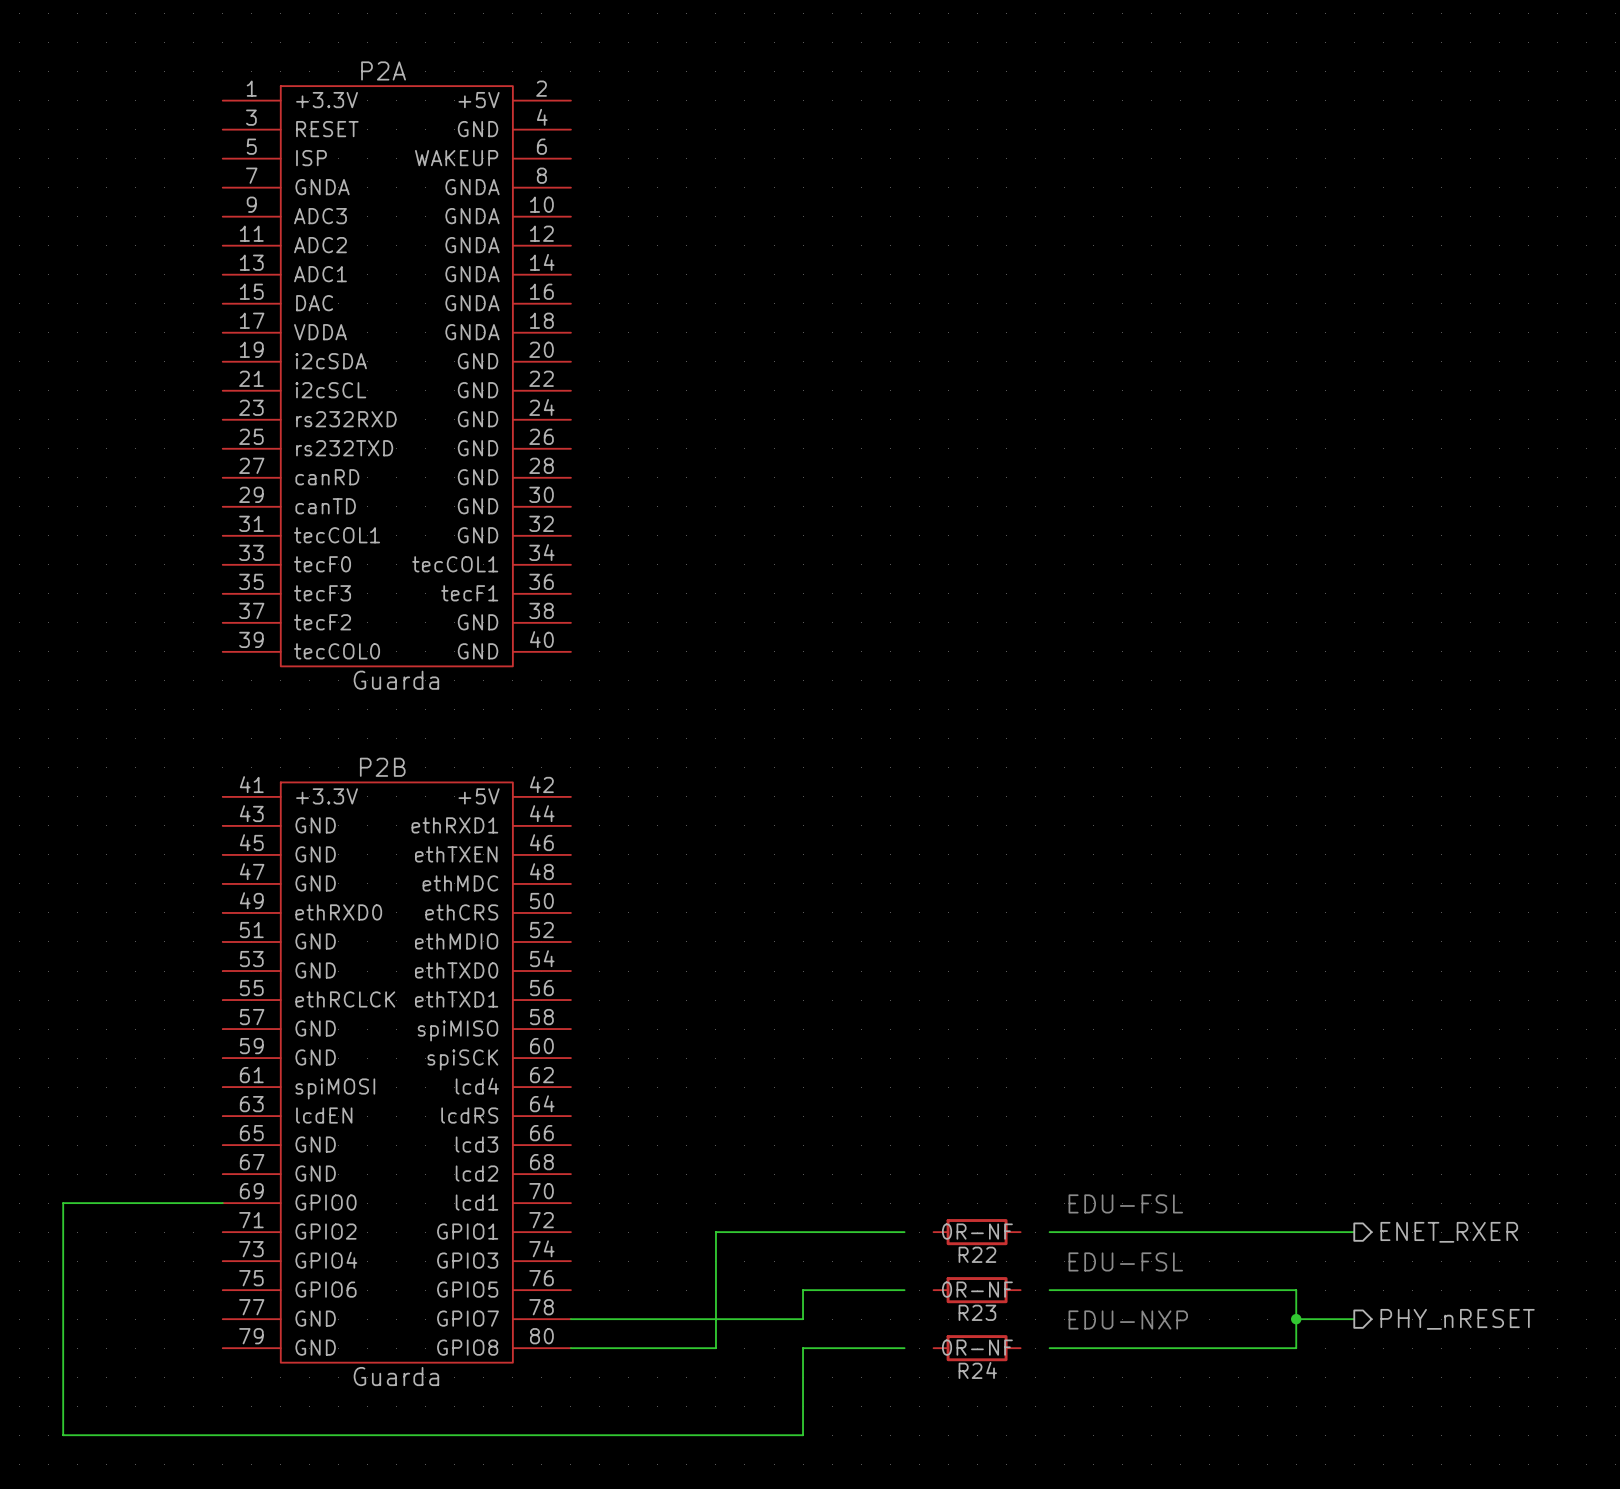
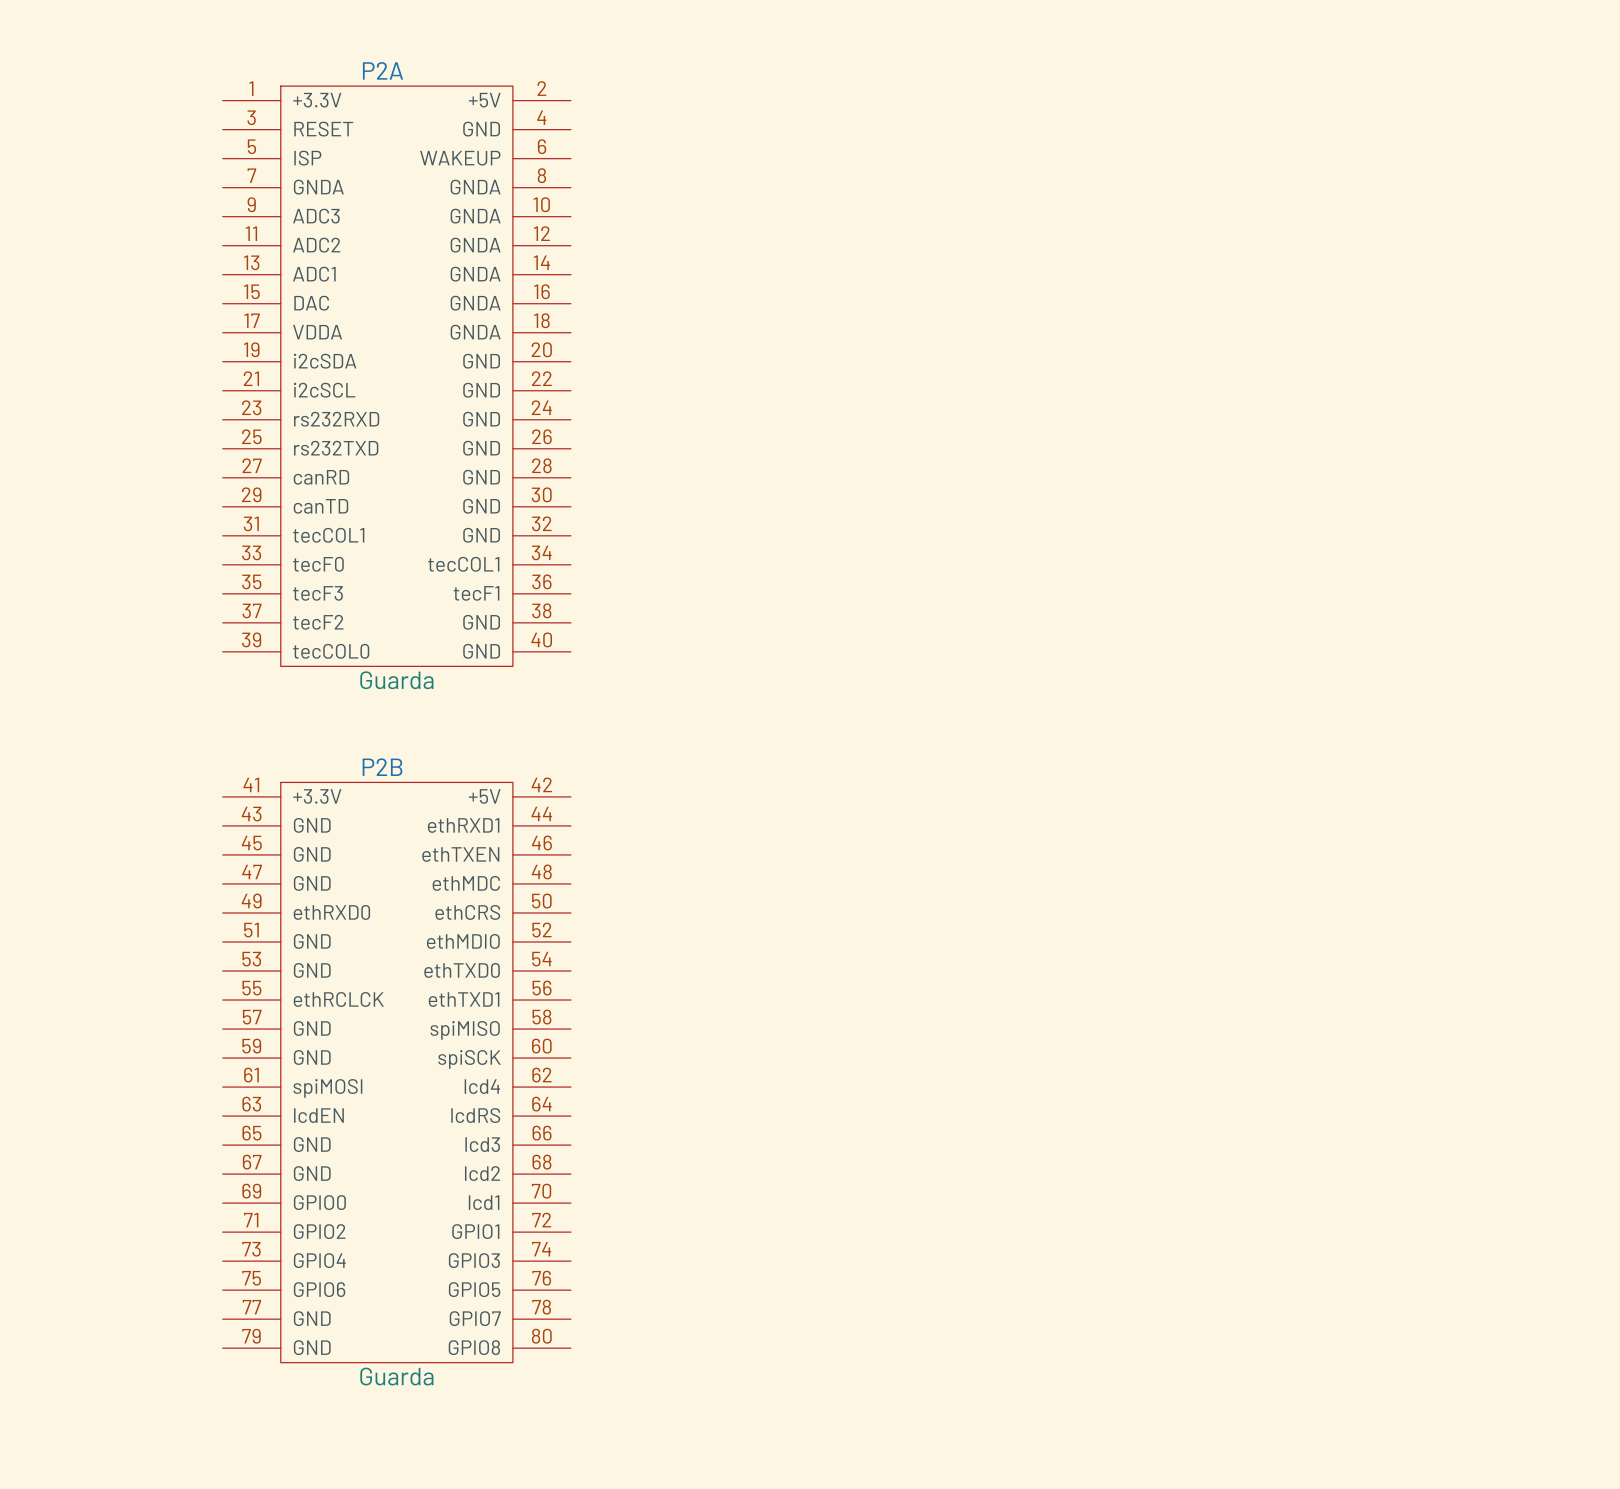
wire: (222, 1203) (63, 1203) (63, 1435) (803, 1435) (803, 1348) (904, 1348) -> none
text: EDU-FSL (1125, 1203) -> none
wire: (904, 1232) (715, 1232) (715, 1348) (570, 1348) -> none
R22: 0R-NF (977, 1232) -> none
wire: (1049, 1232) (1354, 1232) -> none
hierarchical label: ENET_RXER (1449, 1232) -> none
text: EDU-FSL (1125, 1261) -> none
wire: (904, 1290) (803, 1290) (803, 1319) (570, 1319) -> none
R23: 0R-NF (977, 1290) -> none
wire: (1049, 1290) (1296, 1290) (1296, 1348) (1049, 1348) -> none
text: EDU-NXP (1128, 1319) -> none
wire: (1296, 1319) (1354, 1319) -> none
junction: (1296, 1319) -> none
hierarchical label: PHY_nRESET (1457, 1319) -> none
R24: 0R-NF (977, 1348) -> none

